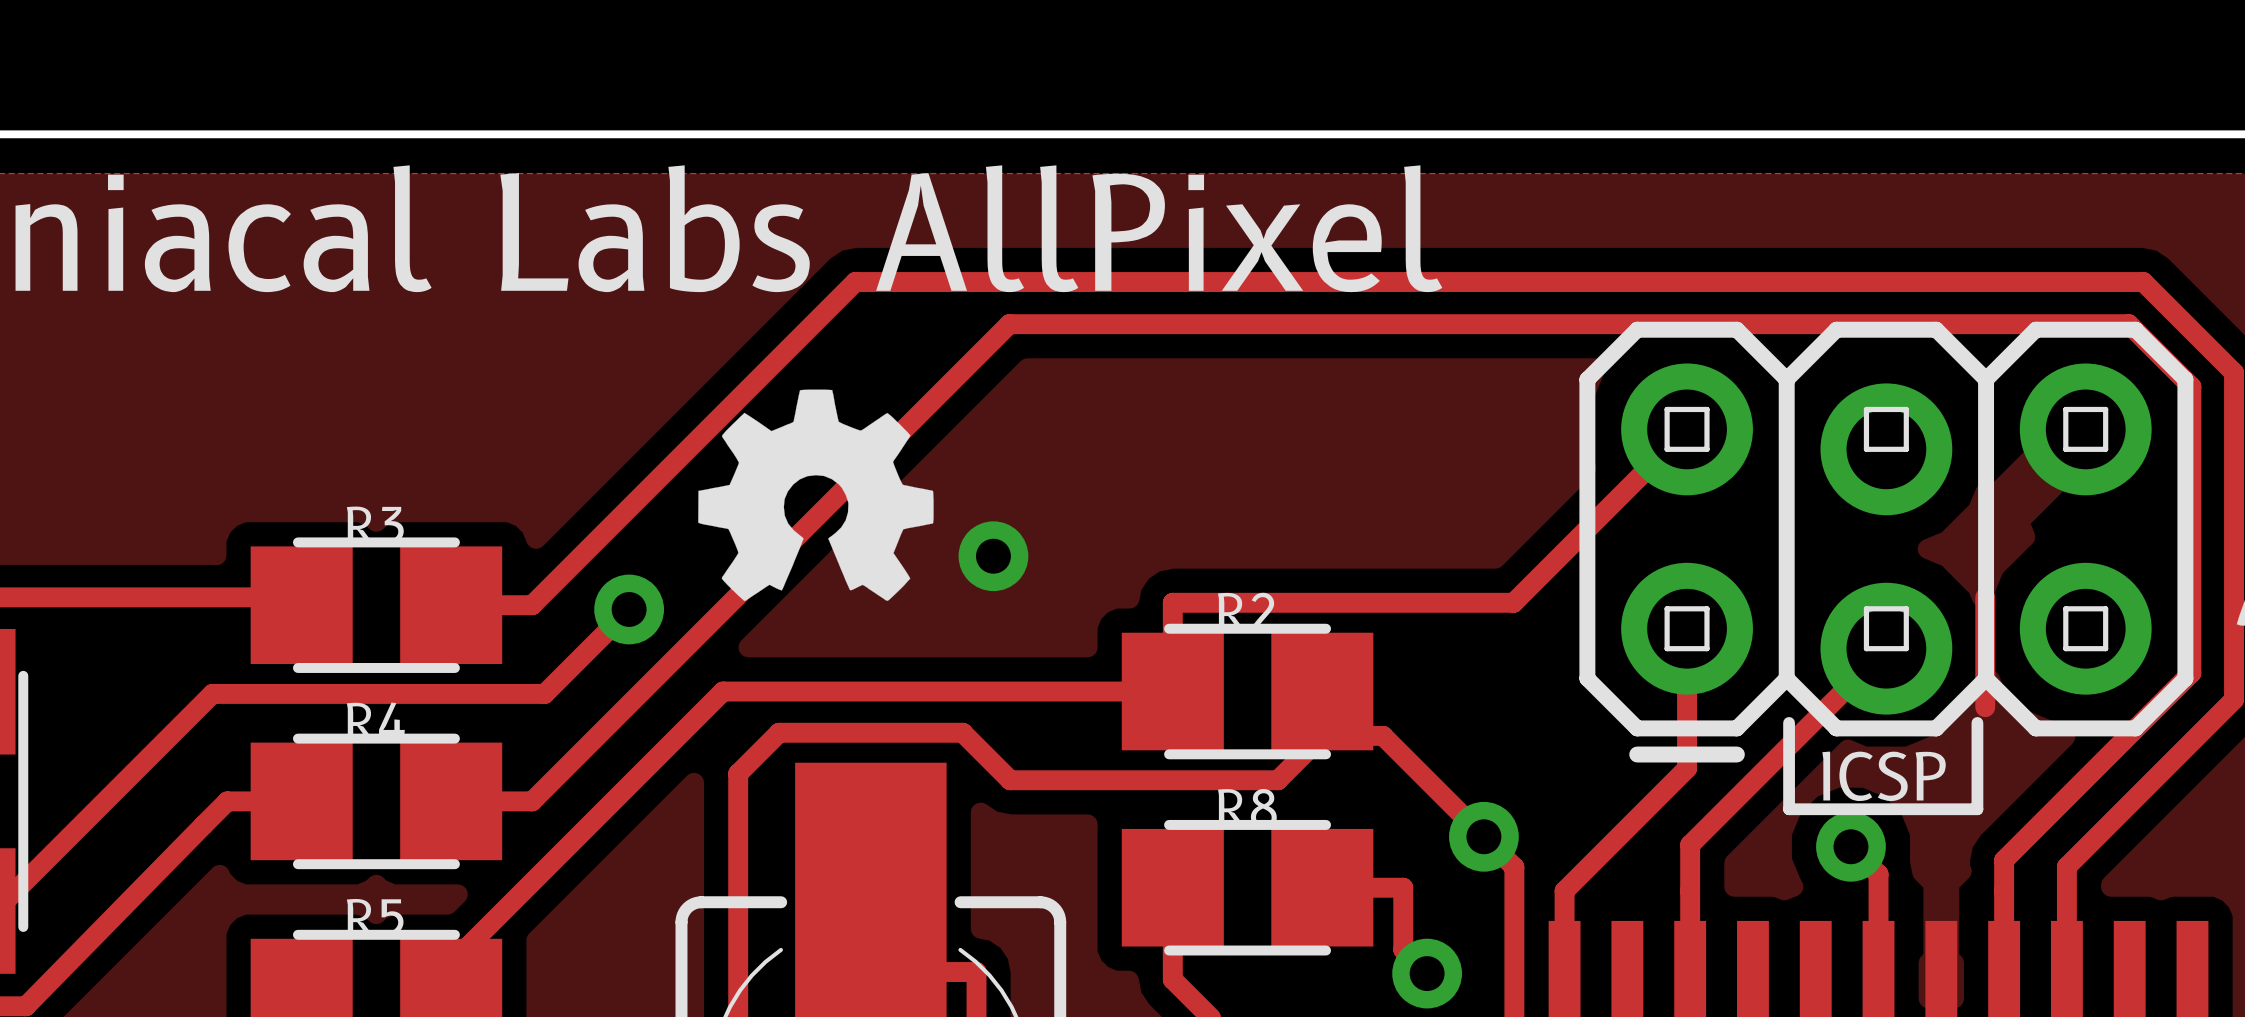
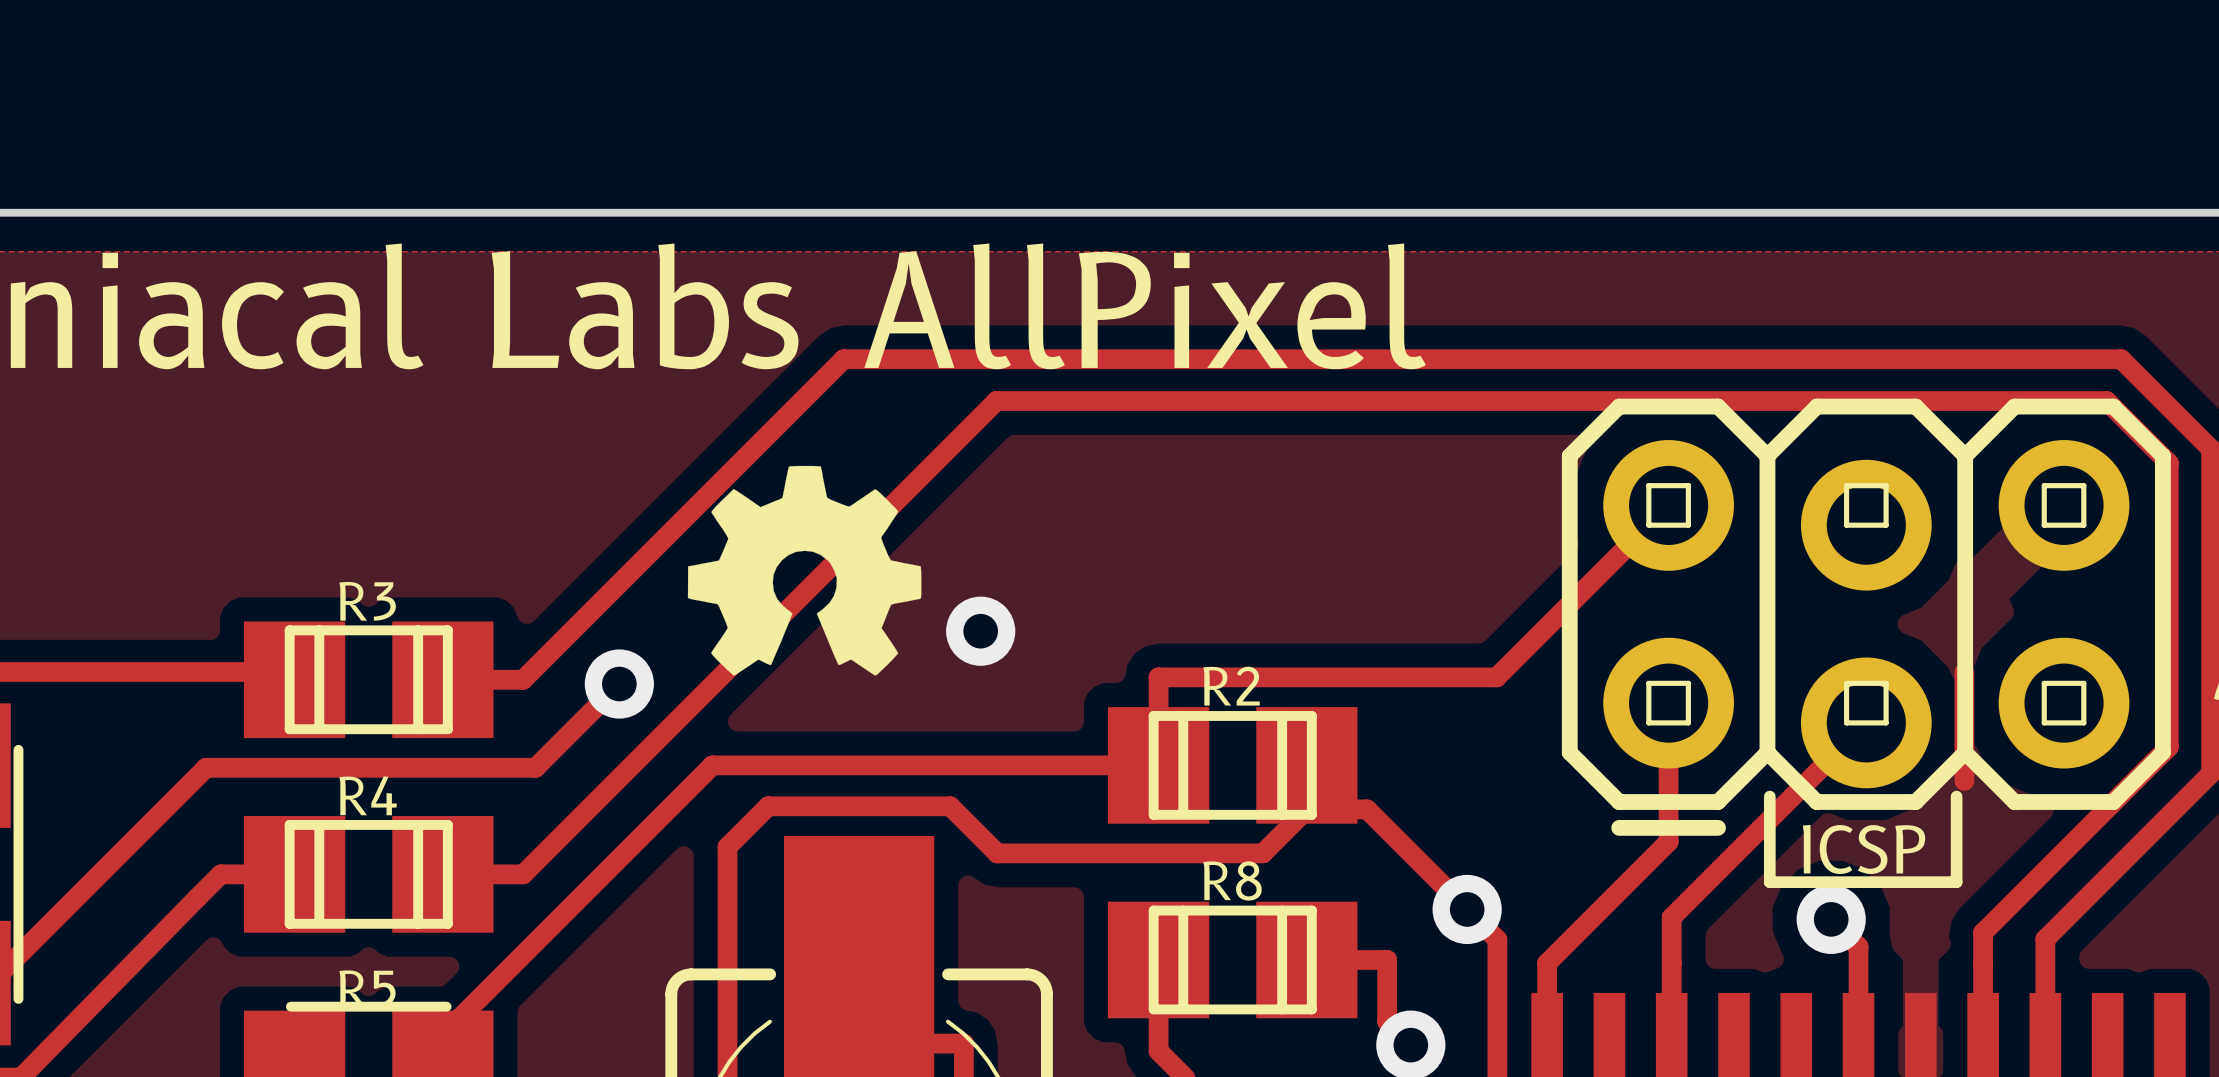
R3 footprint: [250, 537, 503, 673] -> [243, 621, 494, 739]
R2 footprint: [1121, 623, 1374, 760] -> [1107, 707, 1358, 824]
R4 footprint: [250, 733, 503, 870] -> [243, 816, 494, 933]
R8 footprint: [1121, 819, 1374, 956] -> [1107, 901, 1358, 1019]

